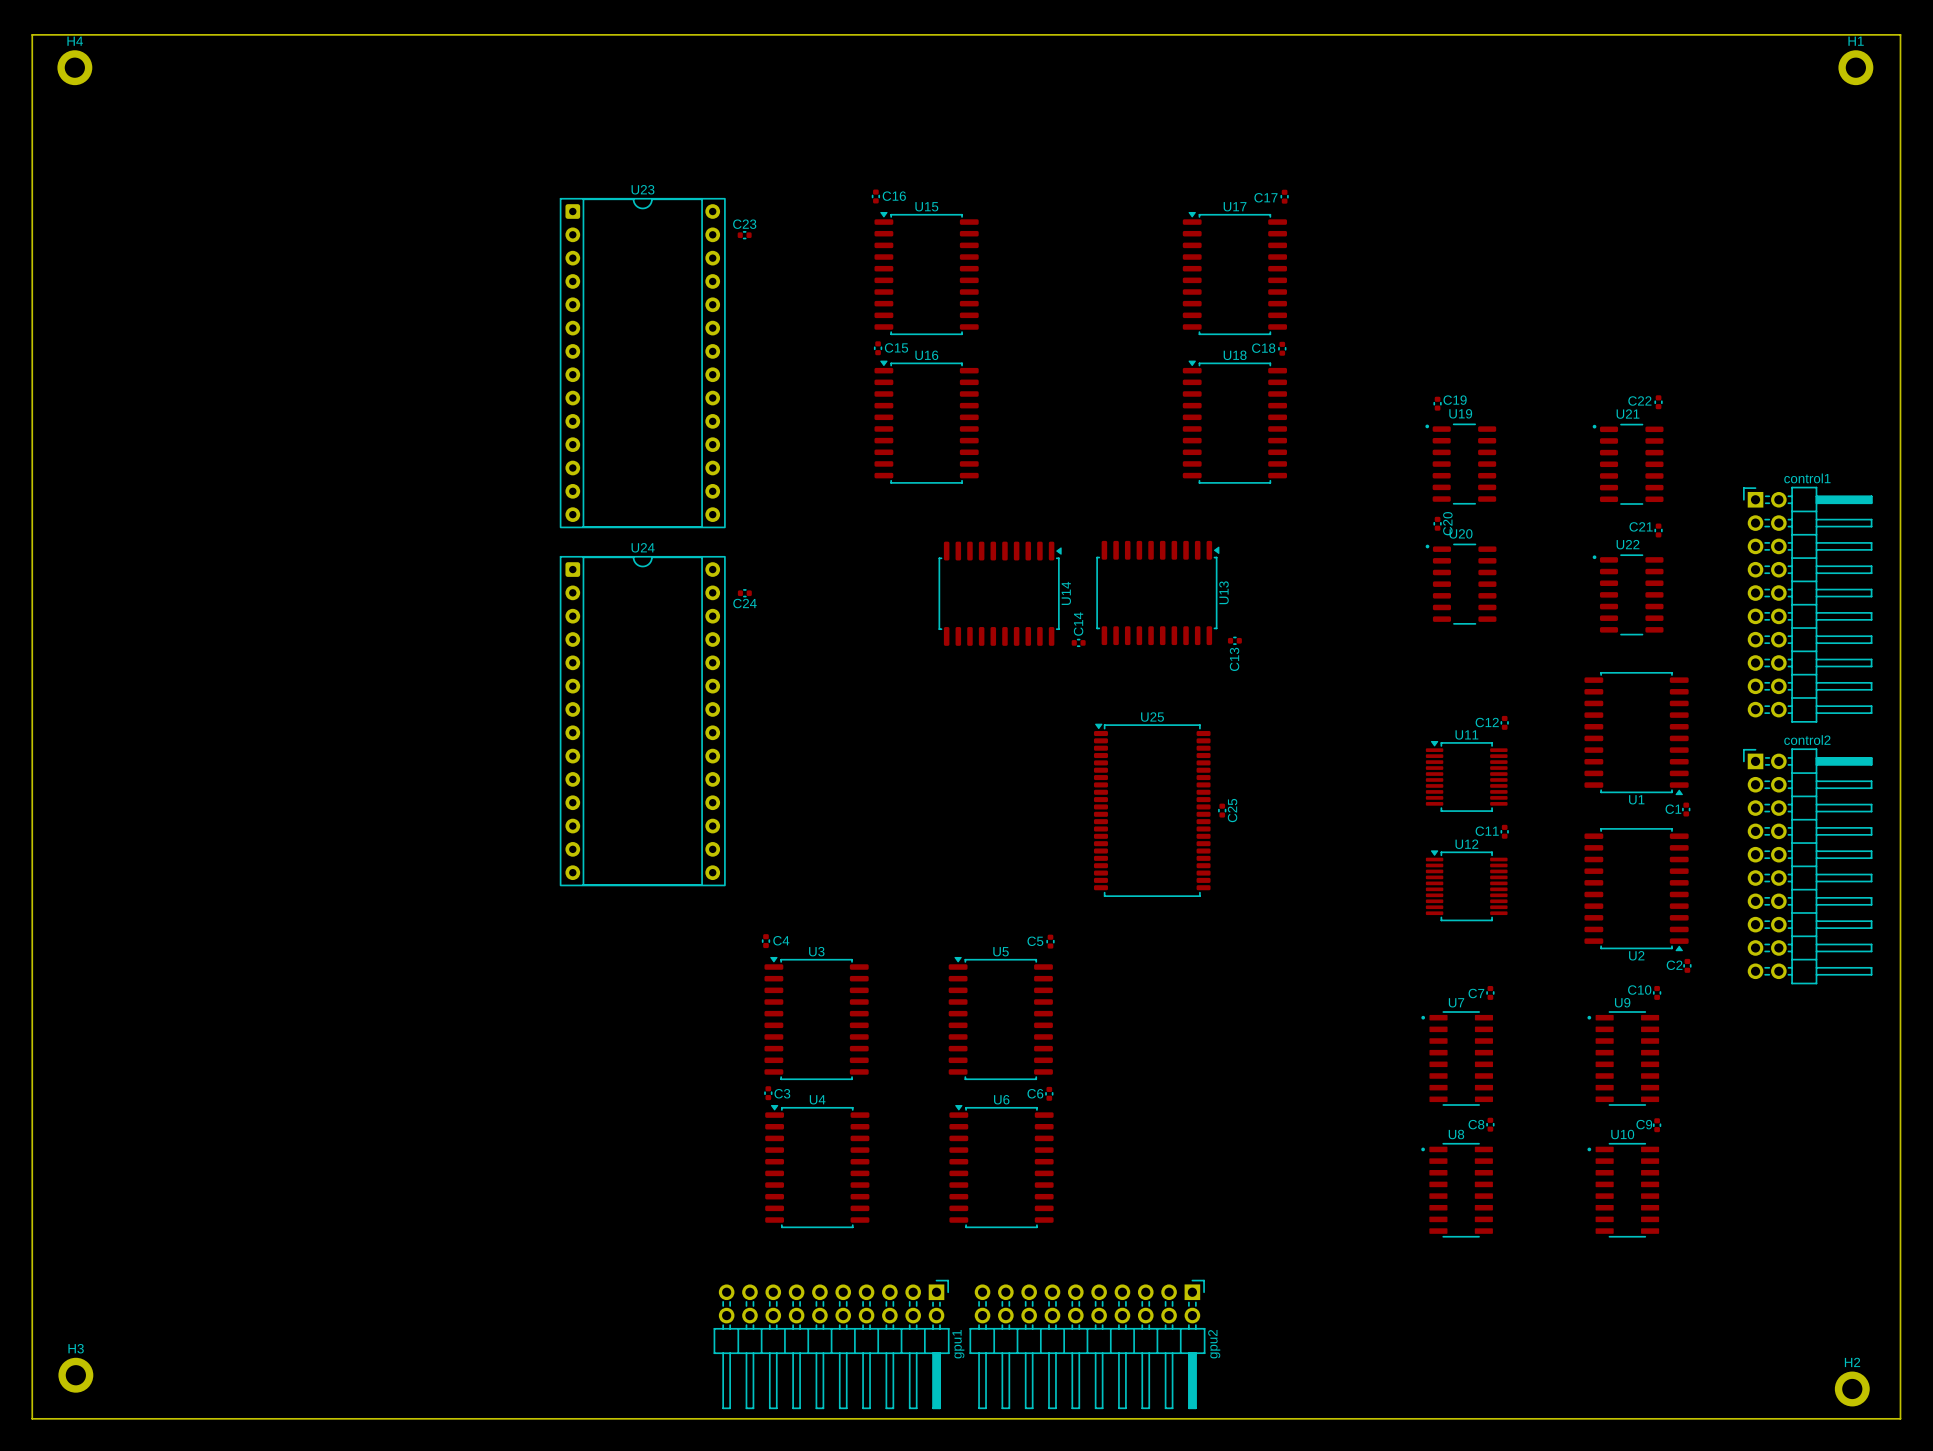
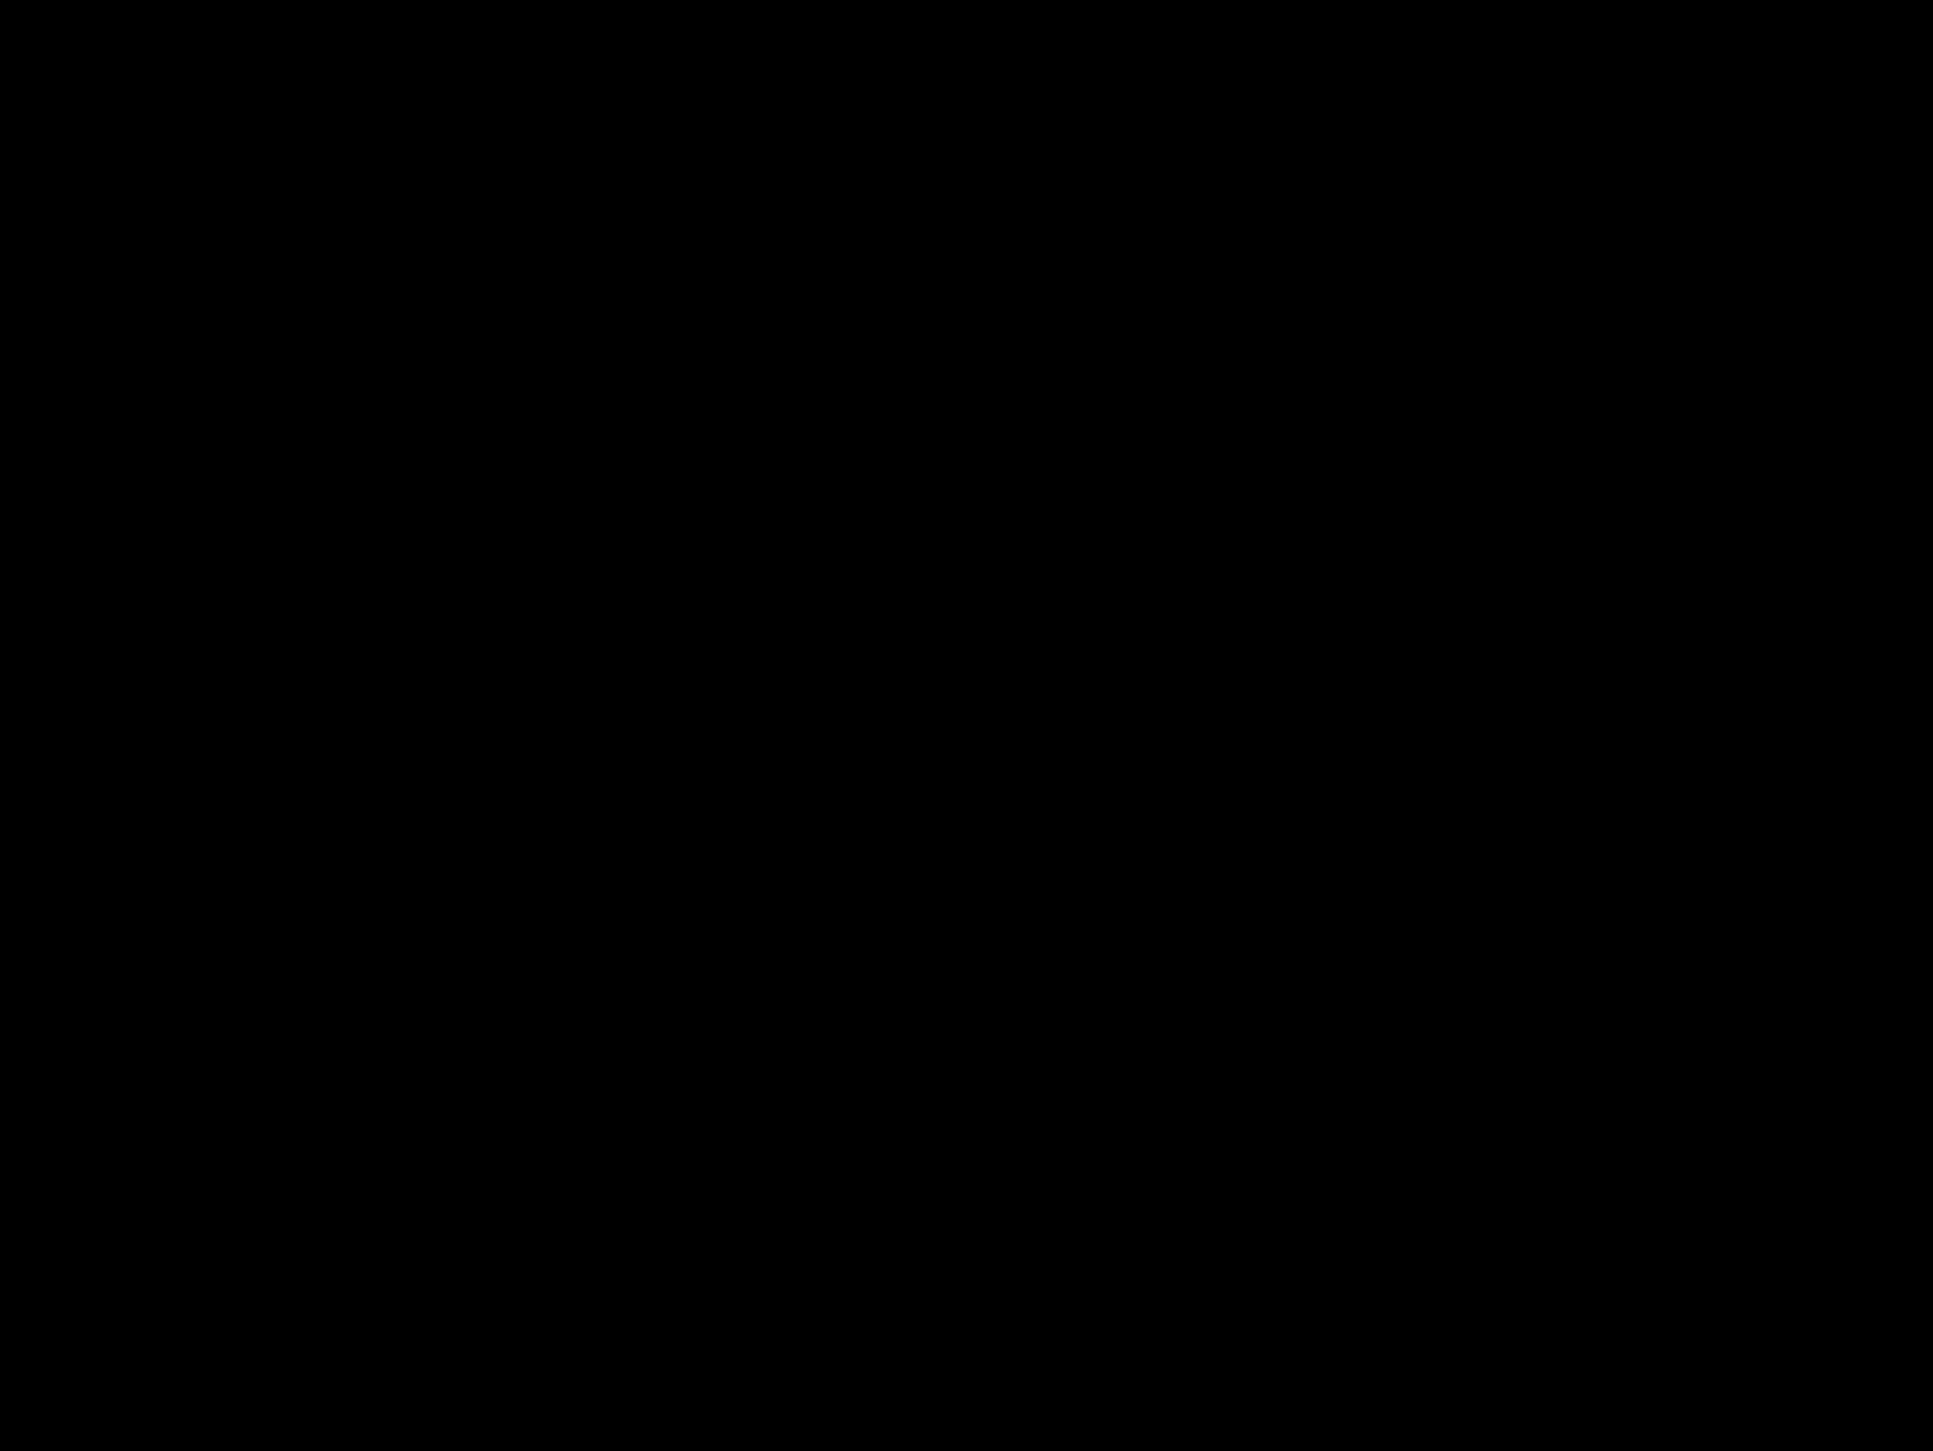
board edge: (32, 34) (1900, 34) (1900, 1418) (32, 1418) (32, 34) -> none
H4: (74, 67) -> none
H1: (1855, 67) -> none
C16: (875, 196) -> none
C17: (1284, 196) -> none
C23: (744, 235) -> none
U15: (926, 273) -> none
U17: (1234, 273) -> none
C15: (878, 348) -> none
C18: (1282, 348) -> none
U23: (642, 363) -> none
C22: (1658, 402) -> none
C19: (1437, 403) -> none
U16: (926, 422) -> none
U18: (1234, 422) -> none
U19: (1460, 464) -> none
U21: (1628, 464) -> none
C20: (1437, 523) -> none
C21: (1658, 530) -> none
U20: (1461, 584) -> none
U13: (1157, 592) -> none
C24: (744, 593) -> none
U14: (1000, 593) -> none
U22: (1628, 594) -> none
control1: (1807, 604) -> none
C13: (1234, 640) -> none
C14: (1078, 642) -> none
U24: (642, 721) -> none
C12: (1504, 722) -> none
U1: (1636, 733) -> none
U11: (1466, 776) -> none
C1: (1686, 809) -> none
U25: (1152, 810) -> none
C25: (1222, 810) -> none
C11: (1504, 831) -> none
control2: (1807, 866) -> none
U12: (1466, 885) -> none
U2: (1636, 889) -> none
C4: (766, 941) -> none
C5: (1050, 941) -> none
C2: (1687, 965) -> none
C7: (1490, 992) -> none
C10: (1657, 992) -> none
U3: (816, 1018) -> none
U5: (1000, 1018) -> none
U7: (1457, 1058) -> none
U9: (1623, 1058) -> none
C3: (768, 1093) -> none
C6: (1049, 1093) -> none
C8: (1490, 1124) -> none
C9: (1657, 1125) -> none
U4: (817, 1166) -> none
U6: (1001, 1166) -> none
U8: (1457, 1190) -> none
U10: (1623, 1190) -> none
gpu1: (831, 1344) -> none
gpu2: (1087, 1344) -> none
H3: (75, 1375) -> none
H2: (1852, 1389) -> none

